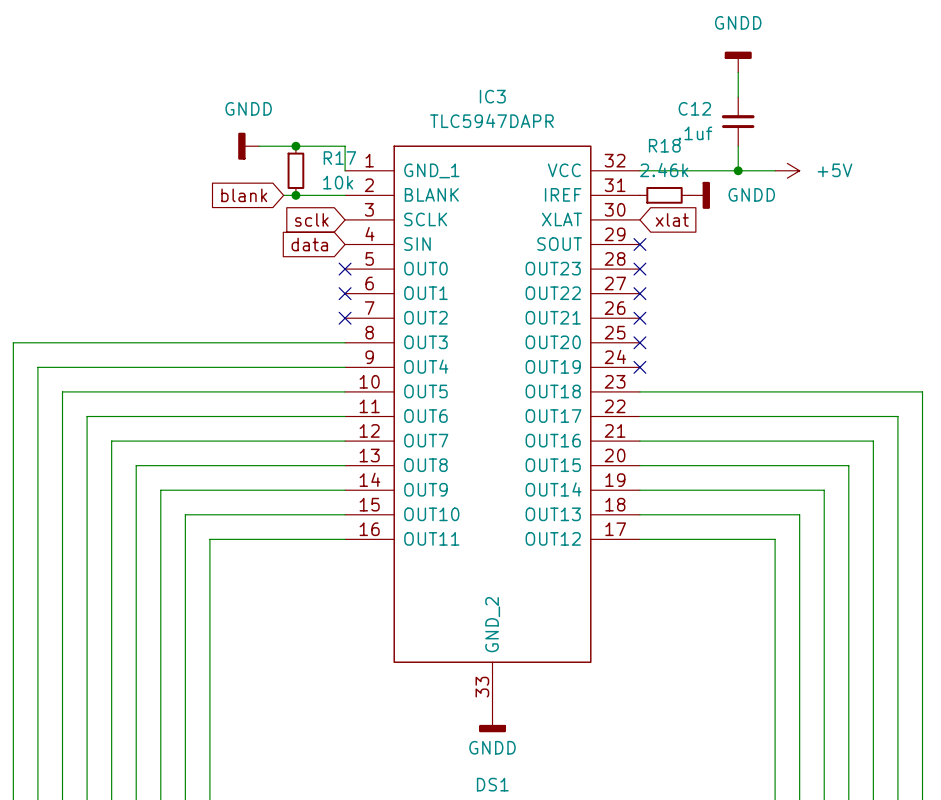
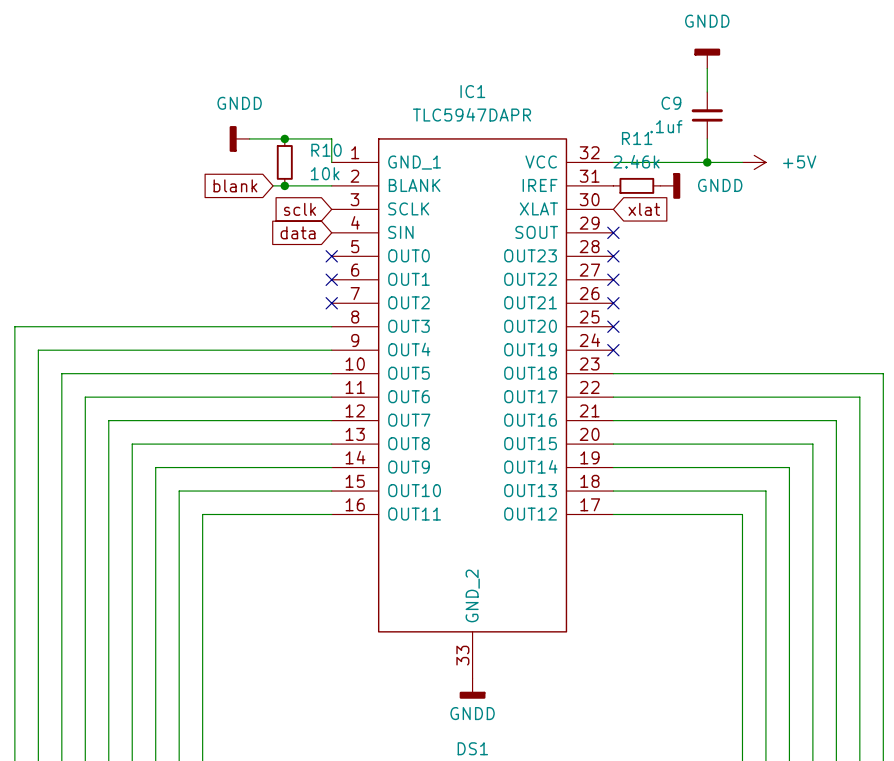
IC3 name: IC3 (492, 96) -> IC1 (472, 91)
C12 name: C12 (694, 108) -> C9 (671, 103)
R18 name: R18 (664, 145) -> R11 (637, 138)
R17 name: R17 (339, 158) -> R10 (326, 150)

